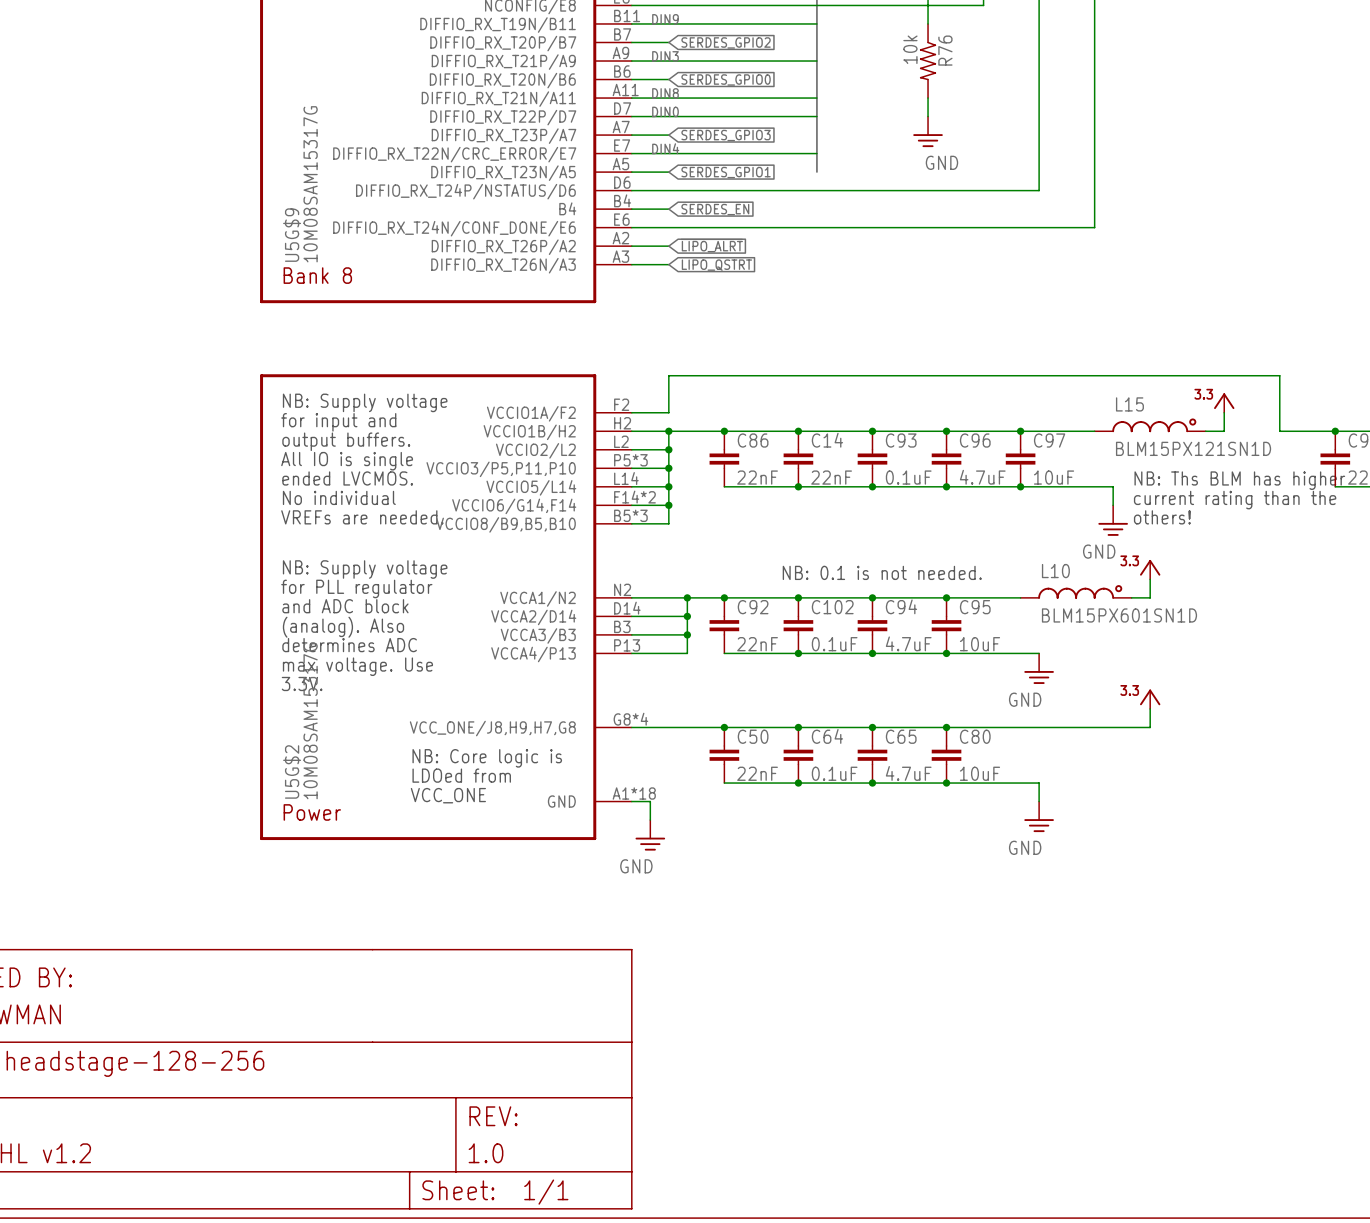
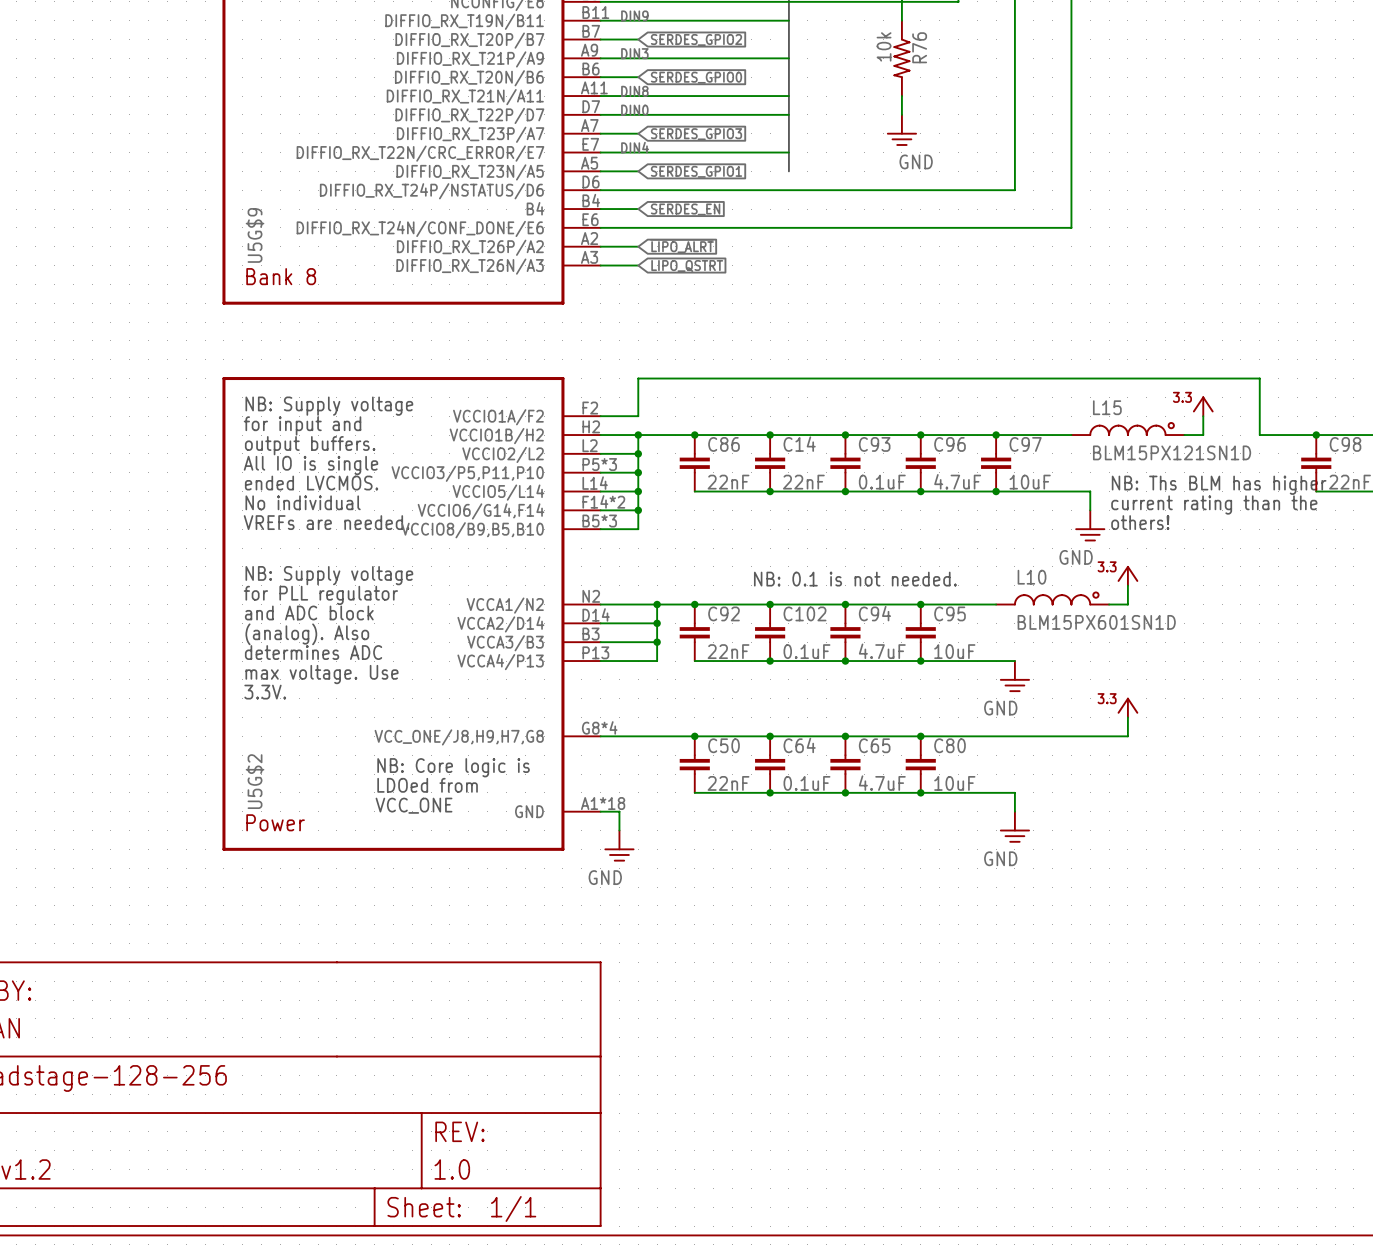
U5G$9 value: 10M08SAM15317G (310, 184) -> none
U5G$2 value: 10M08SAM15317G (310, 721) -> none

